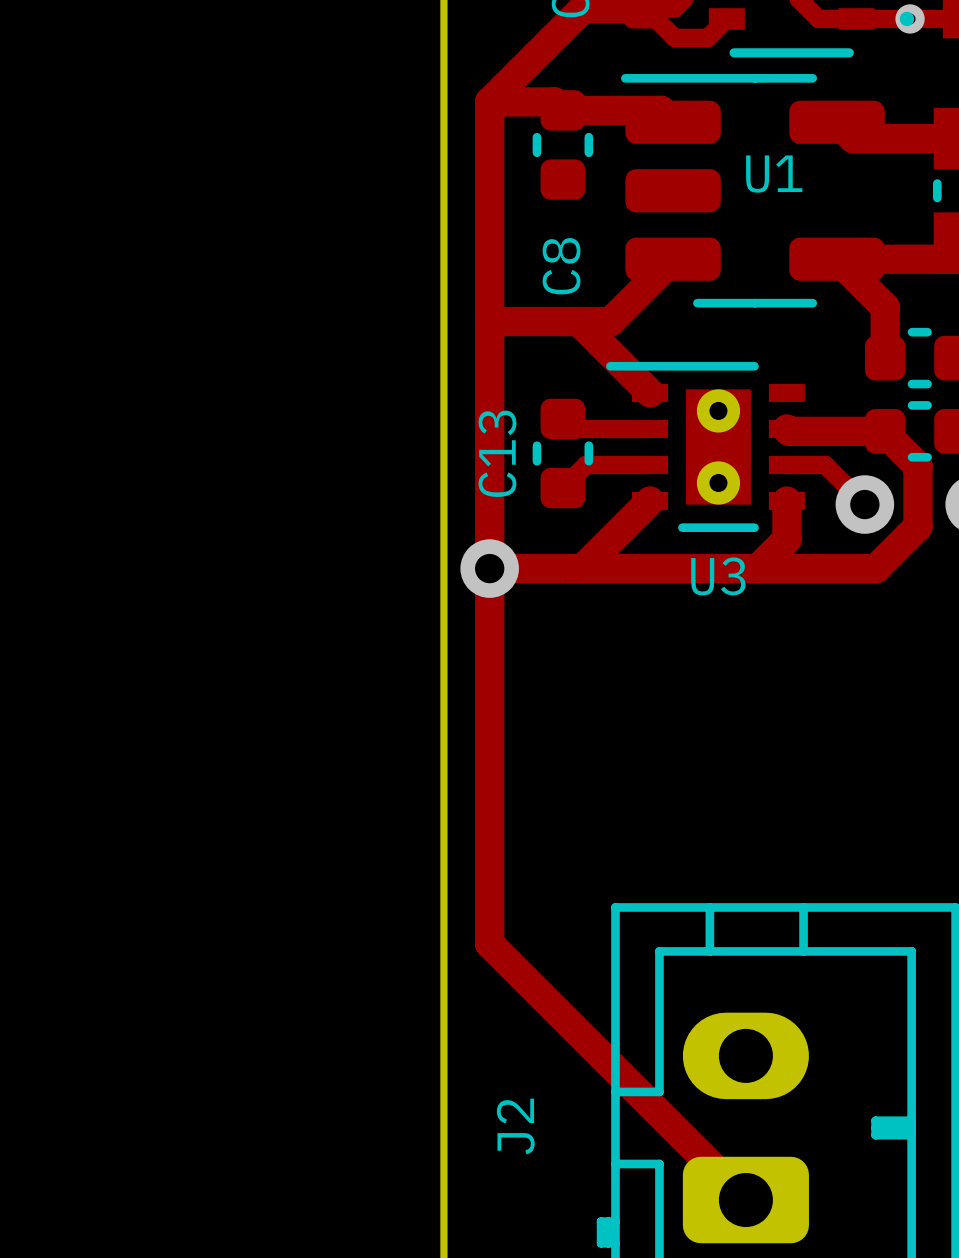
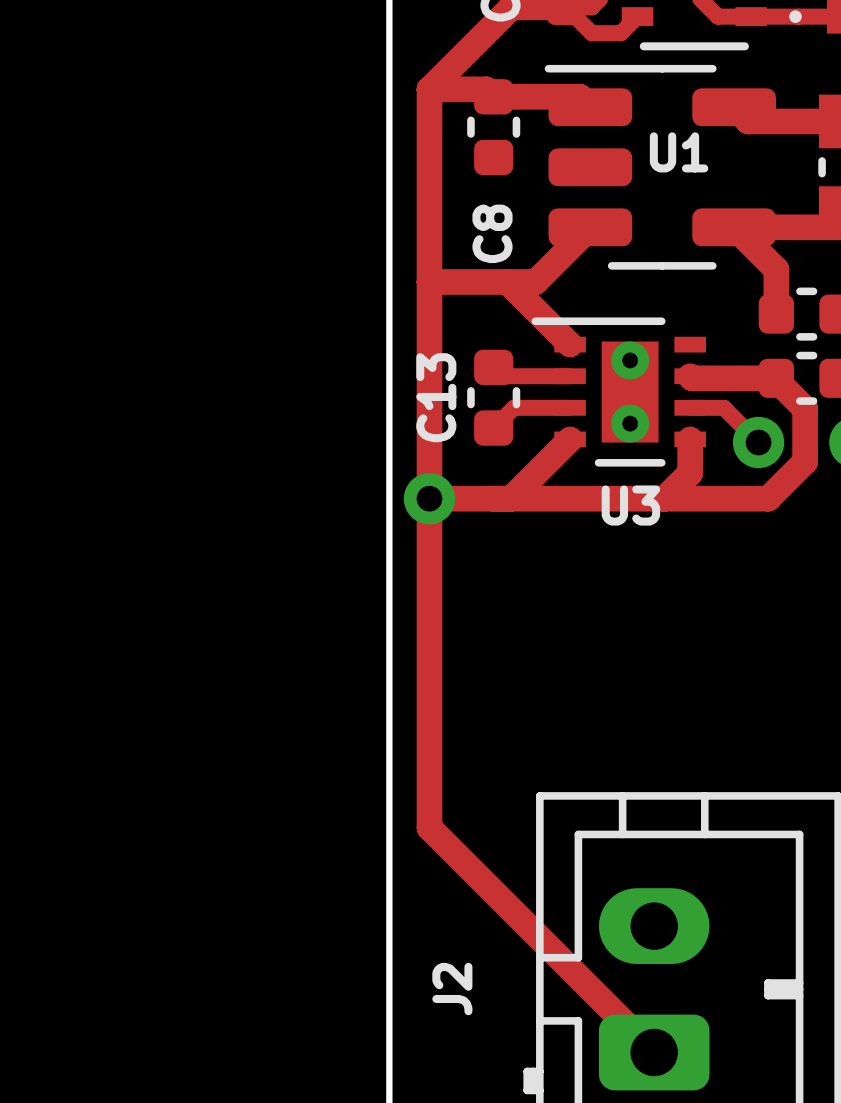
via: (910, 18) -> none

